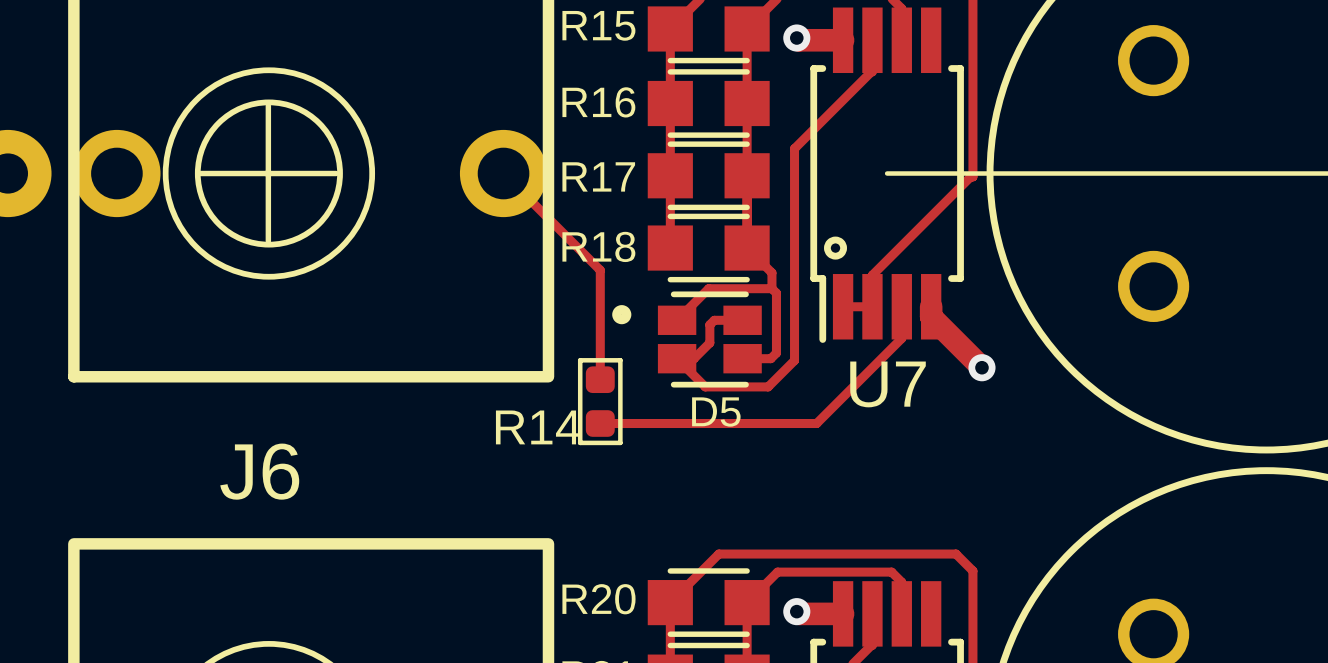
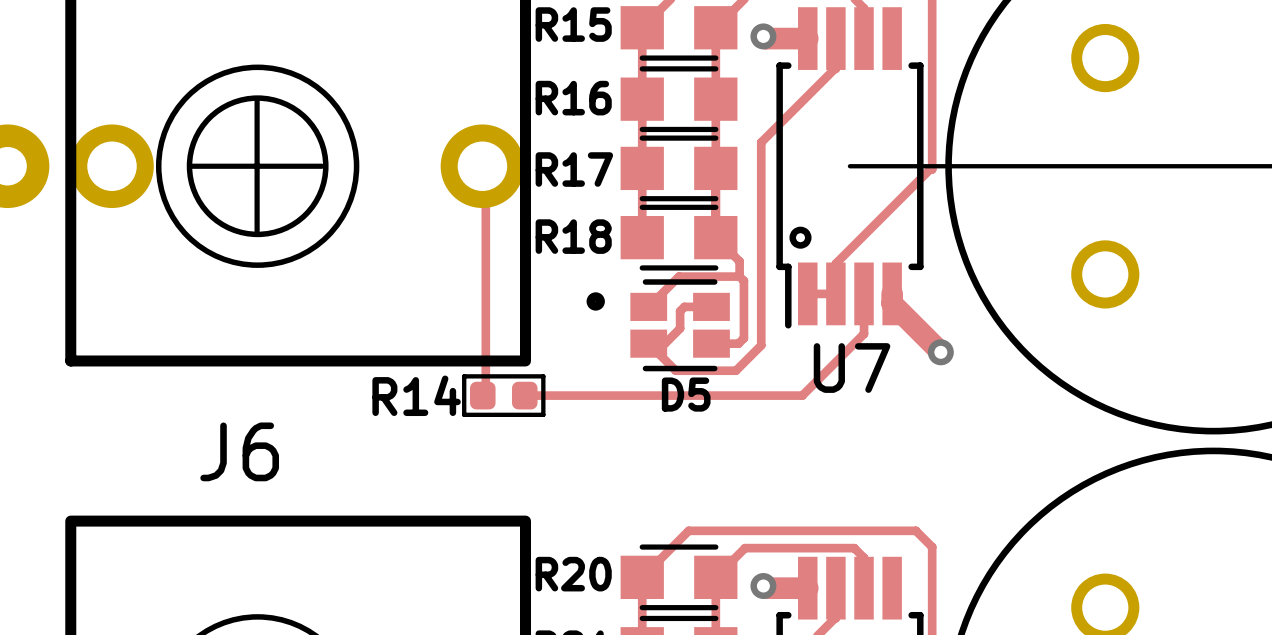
top track: (507, 177) (600, 270) (600, 379) -> (485, 169) (485, 395)
top track: (901, 338) (816, 423) (600, 423) -> (864, 324) (864, 333) (802, 395) (524, 395)
R14 rotation: 0° (600, 401) -> 90° clockwise (503, 395)
R14 position: (600, 401) -> (503, 395)

